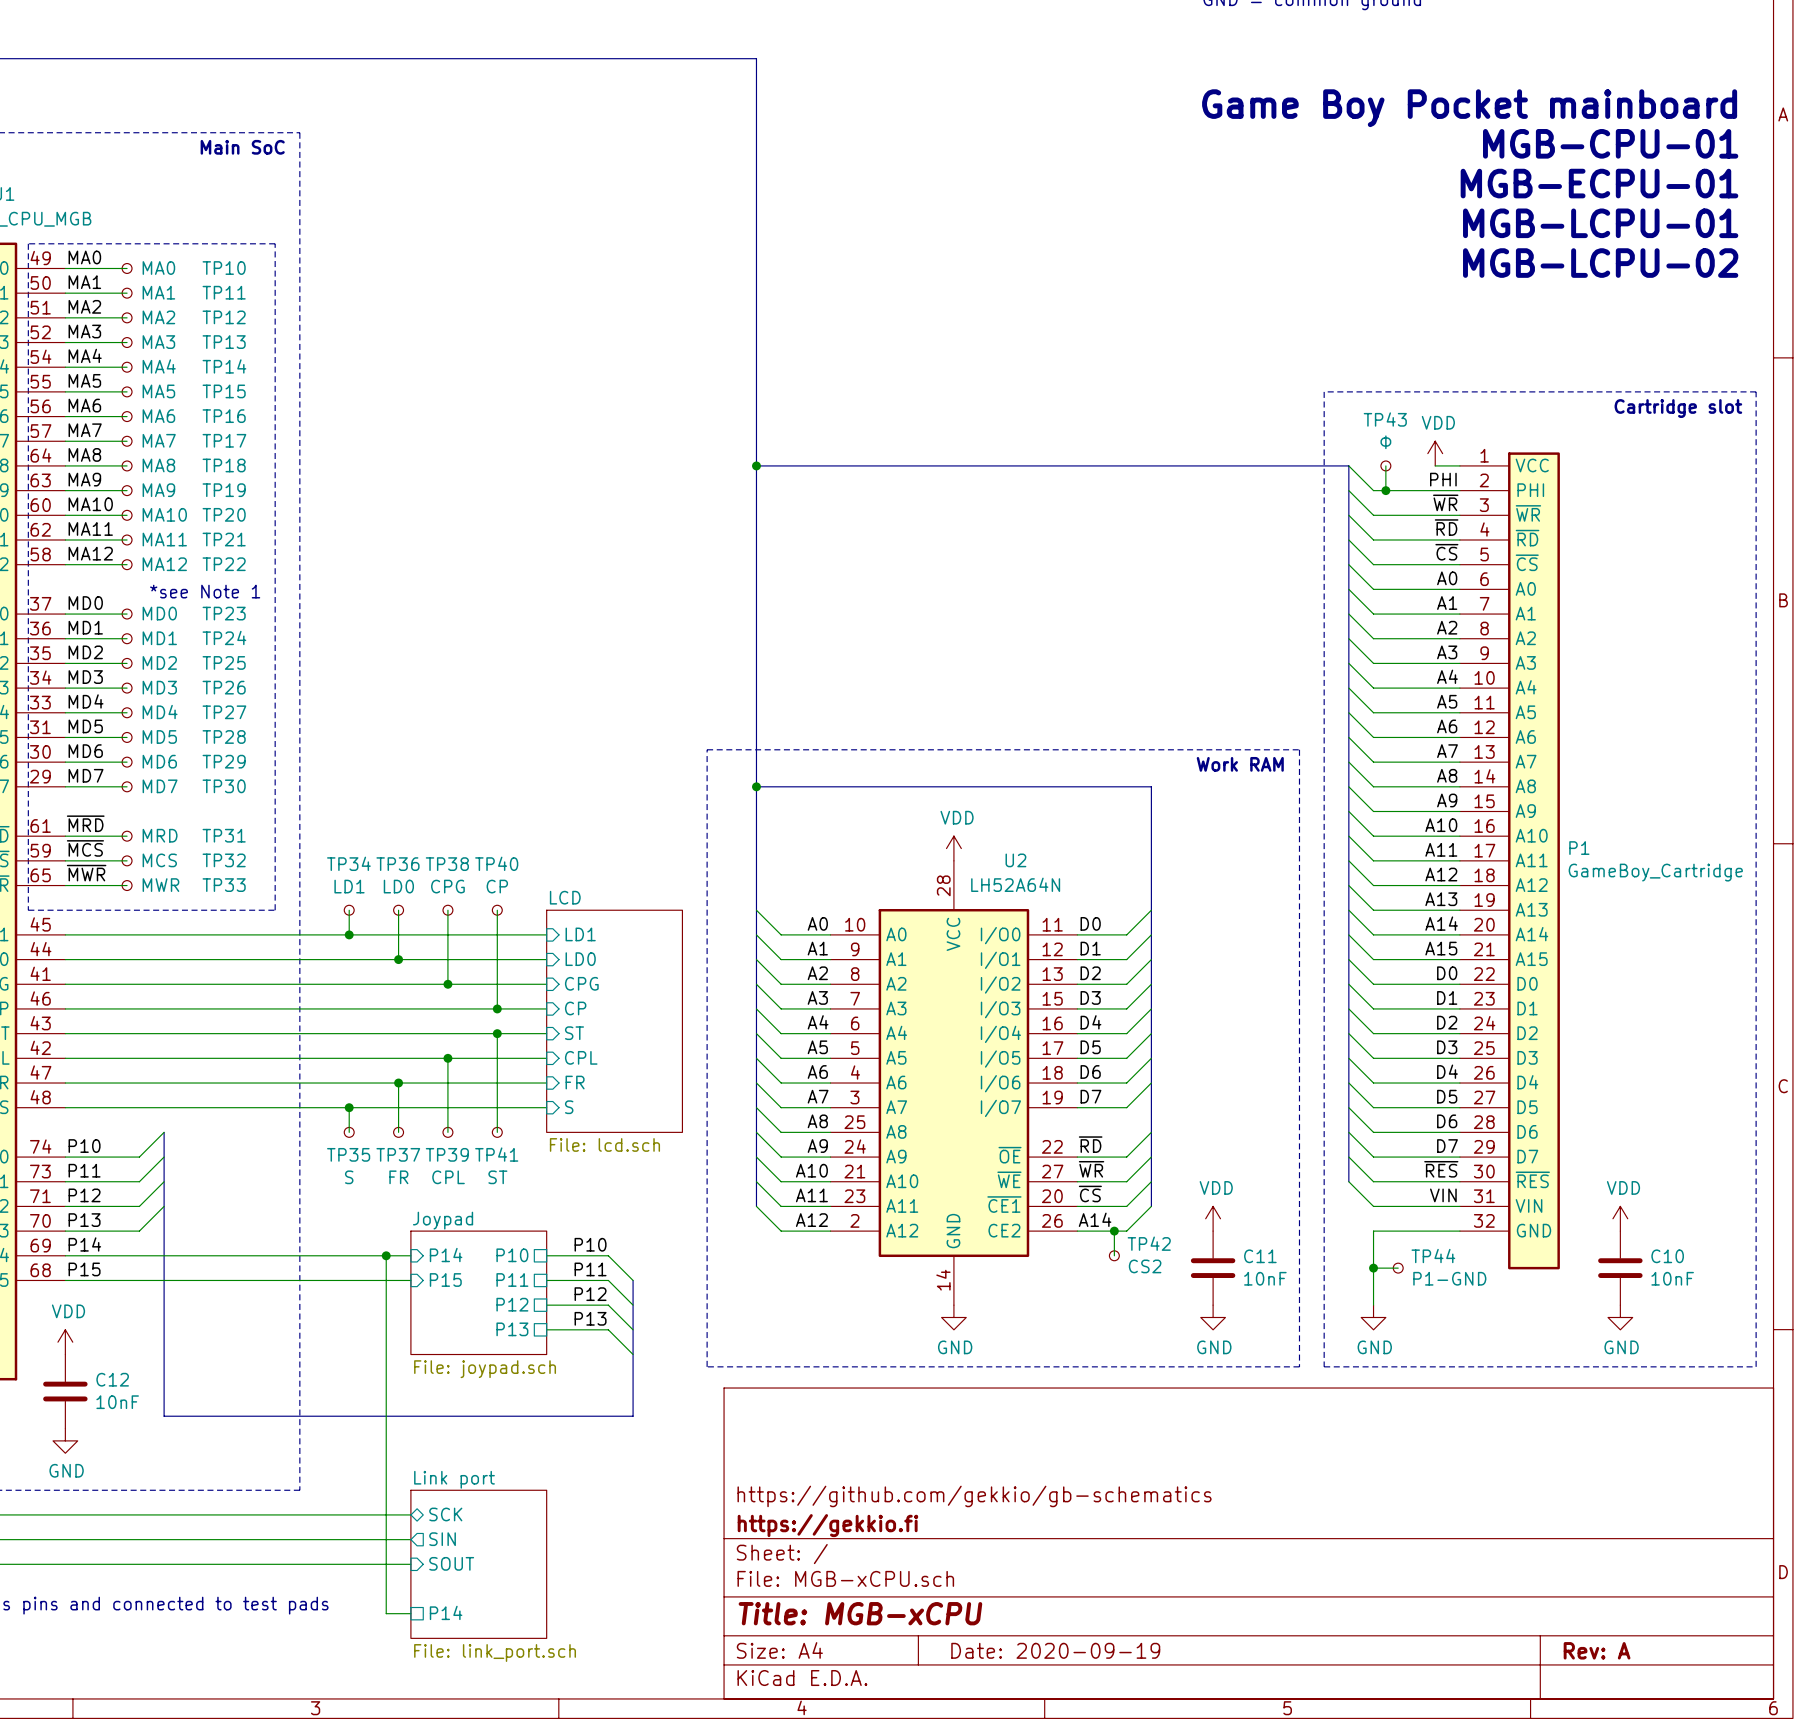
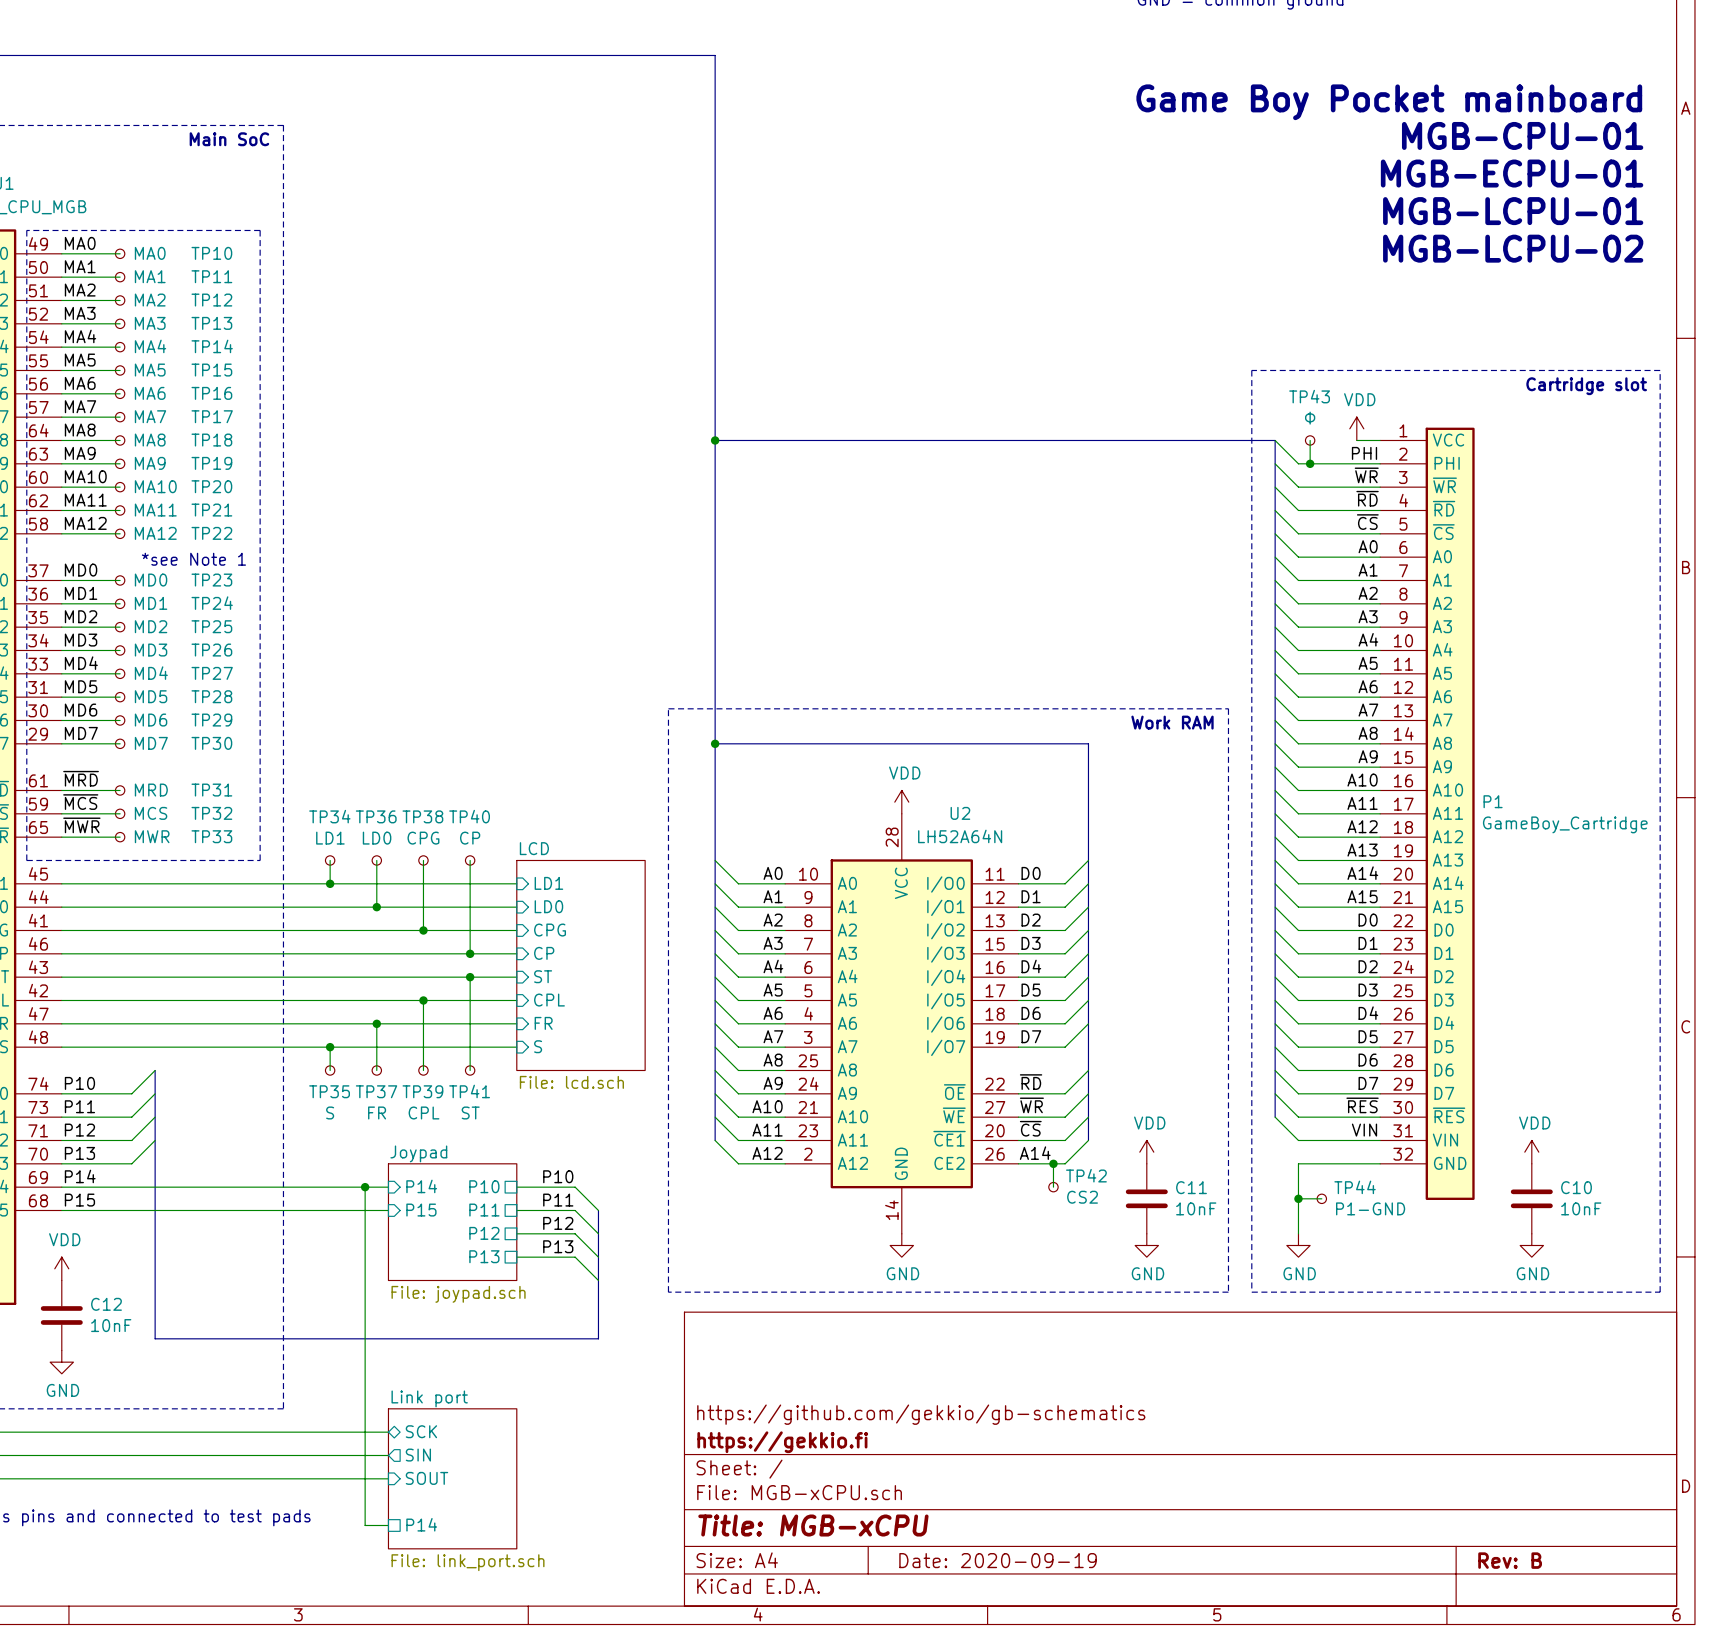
title block: Rev: A (1597, 1650) -> Rev: B (1510, 1560)

